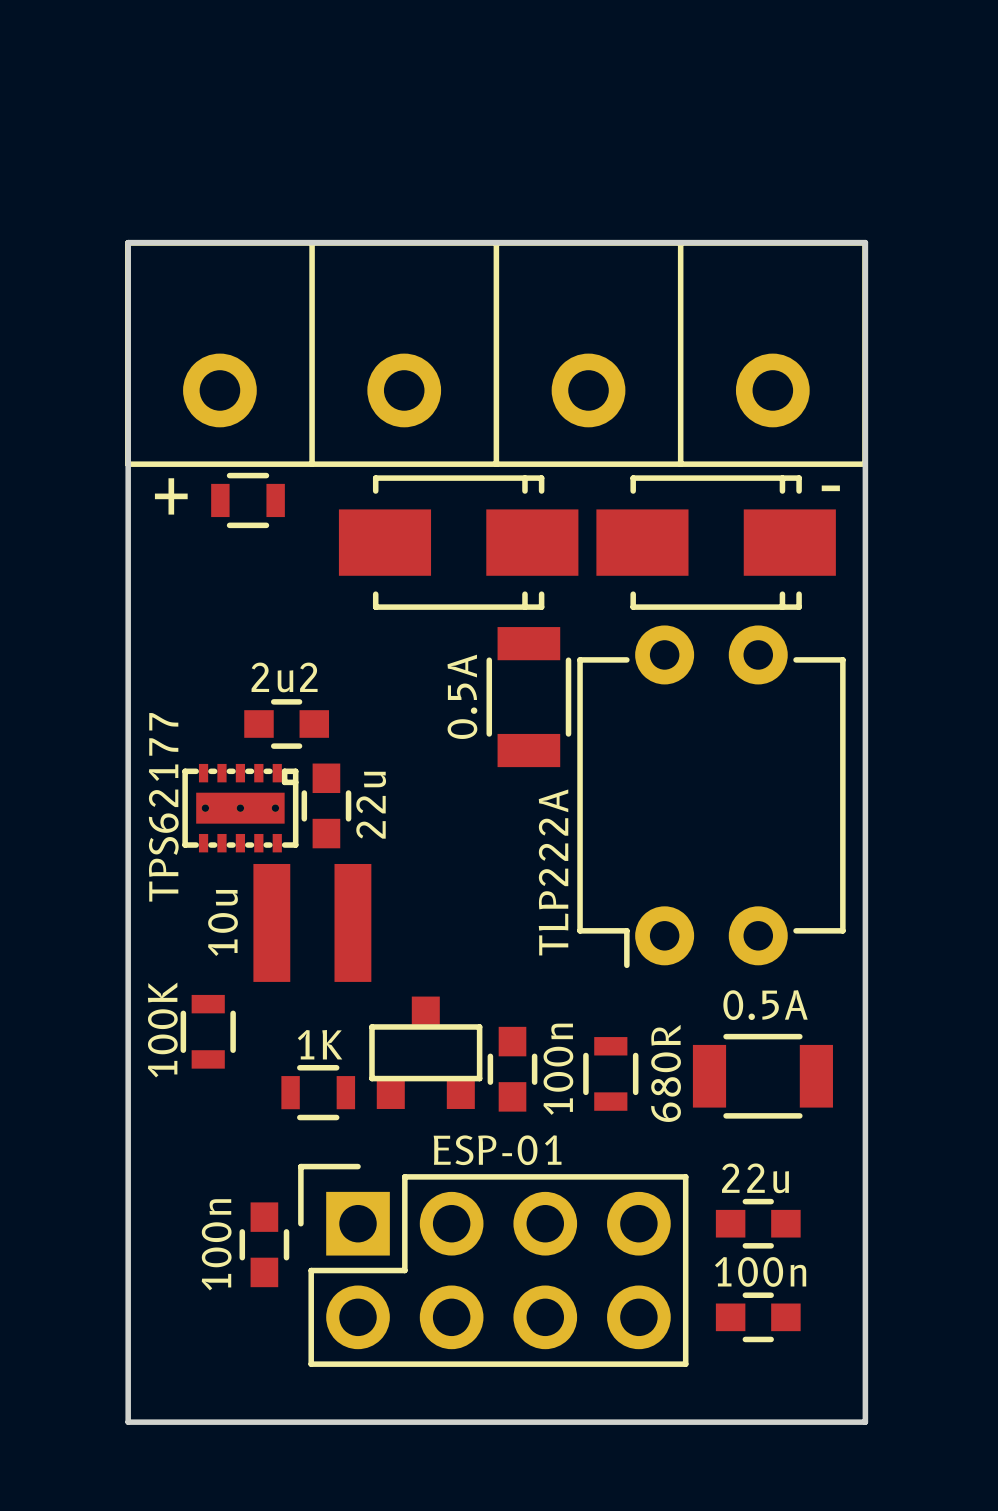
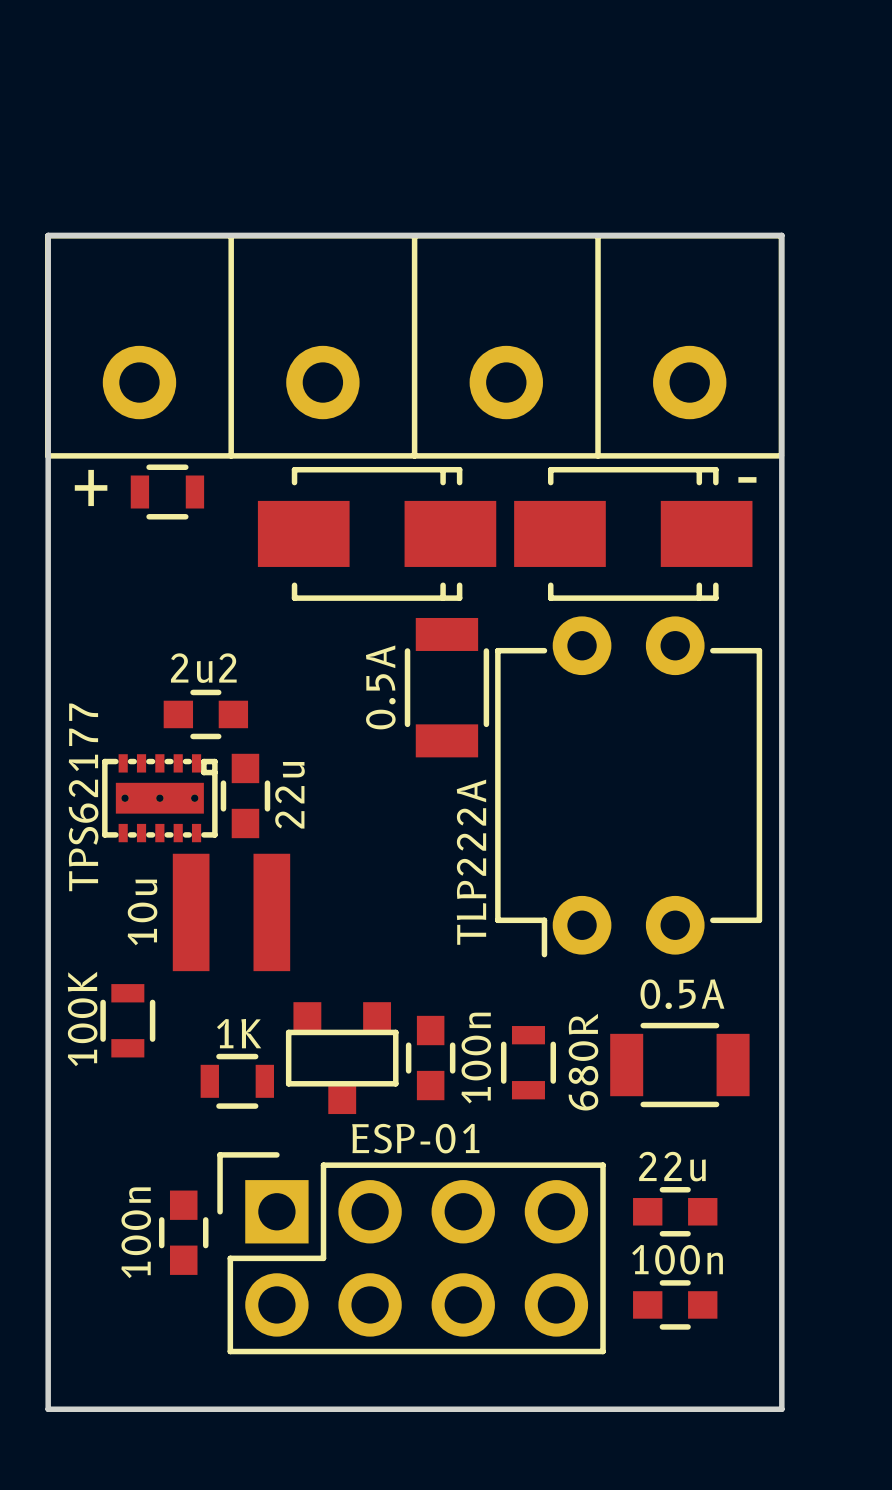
part rotation: 0° (425, 1052) -> 180° (342, 1058)

